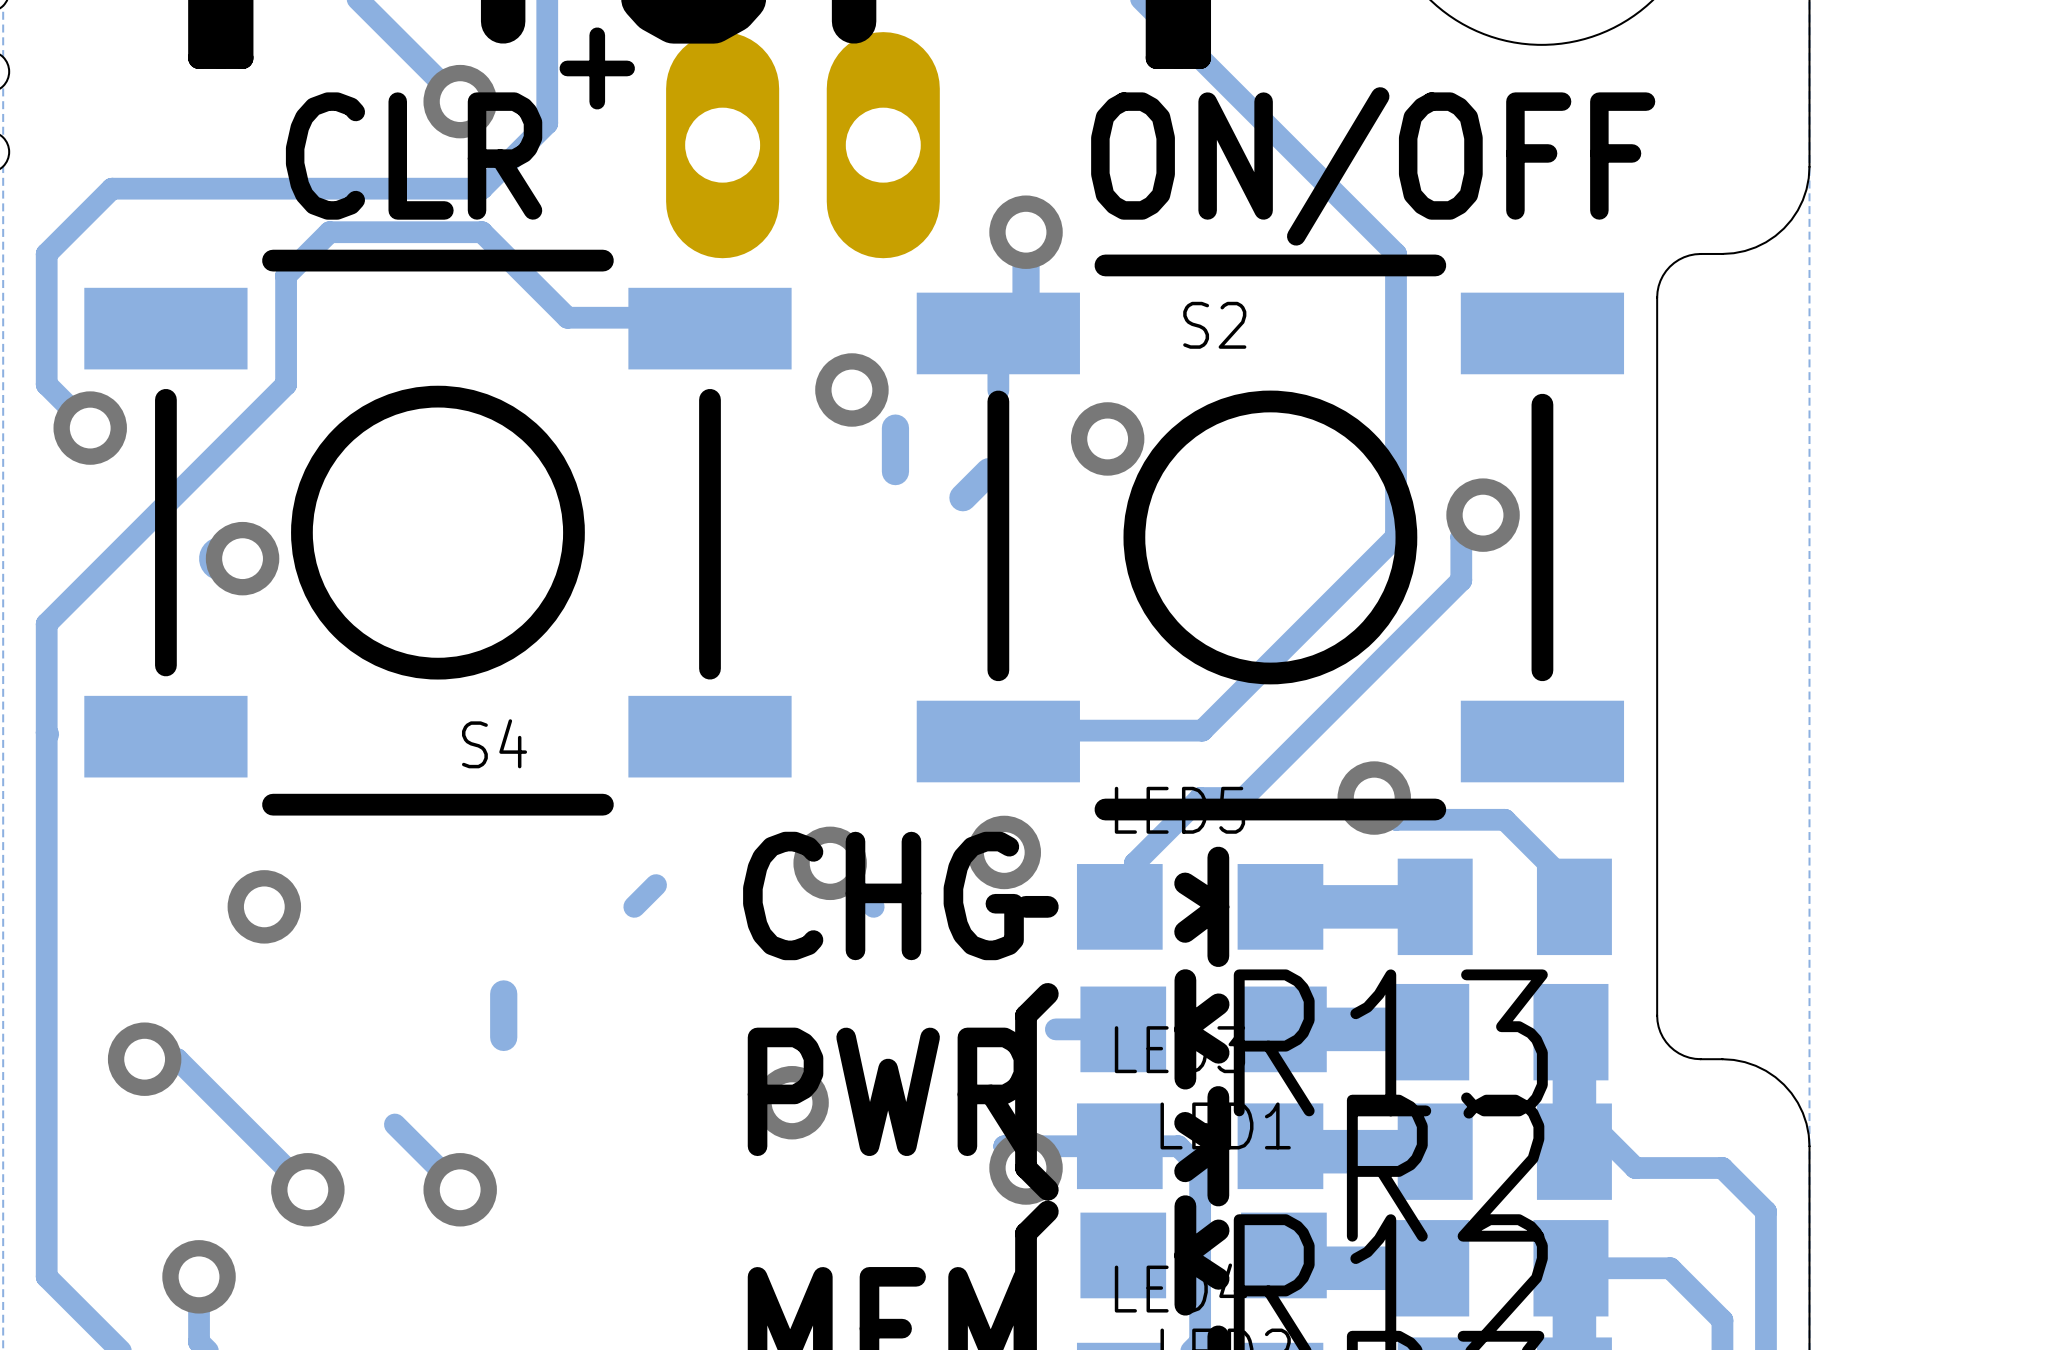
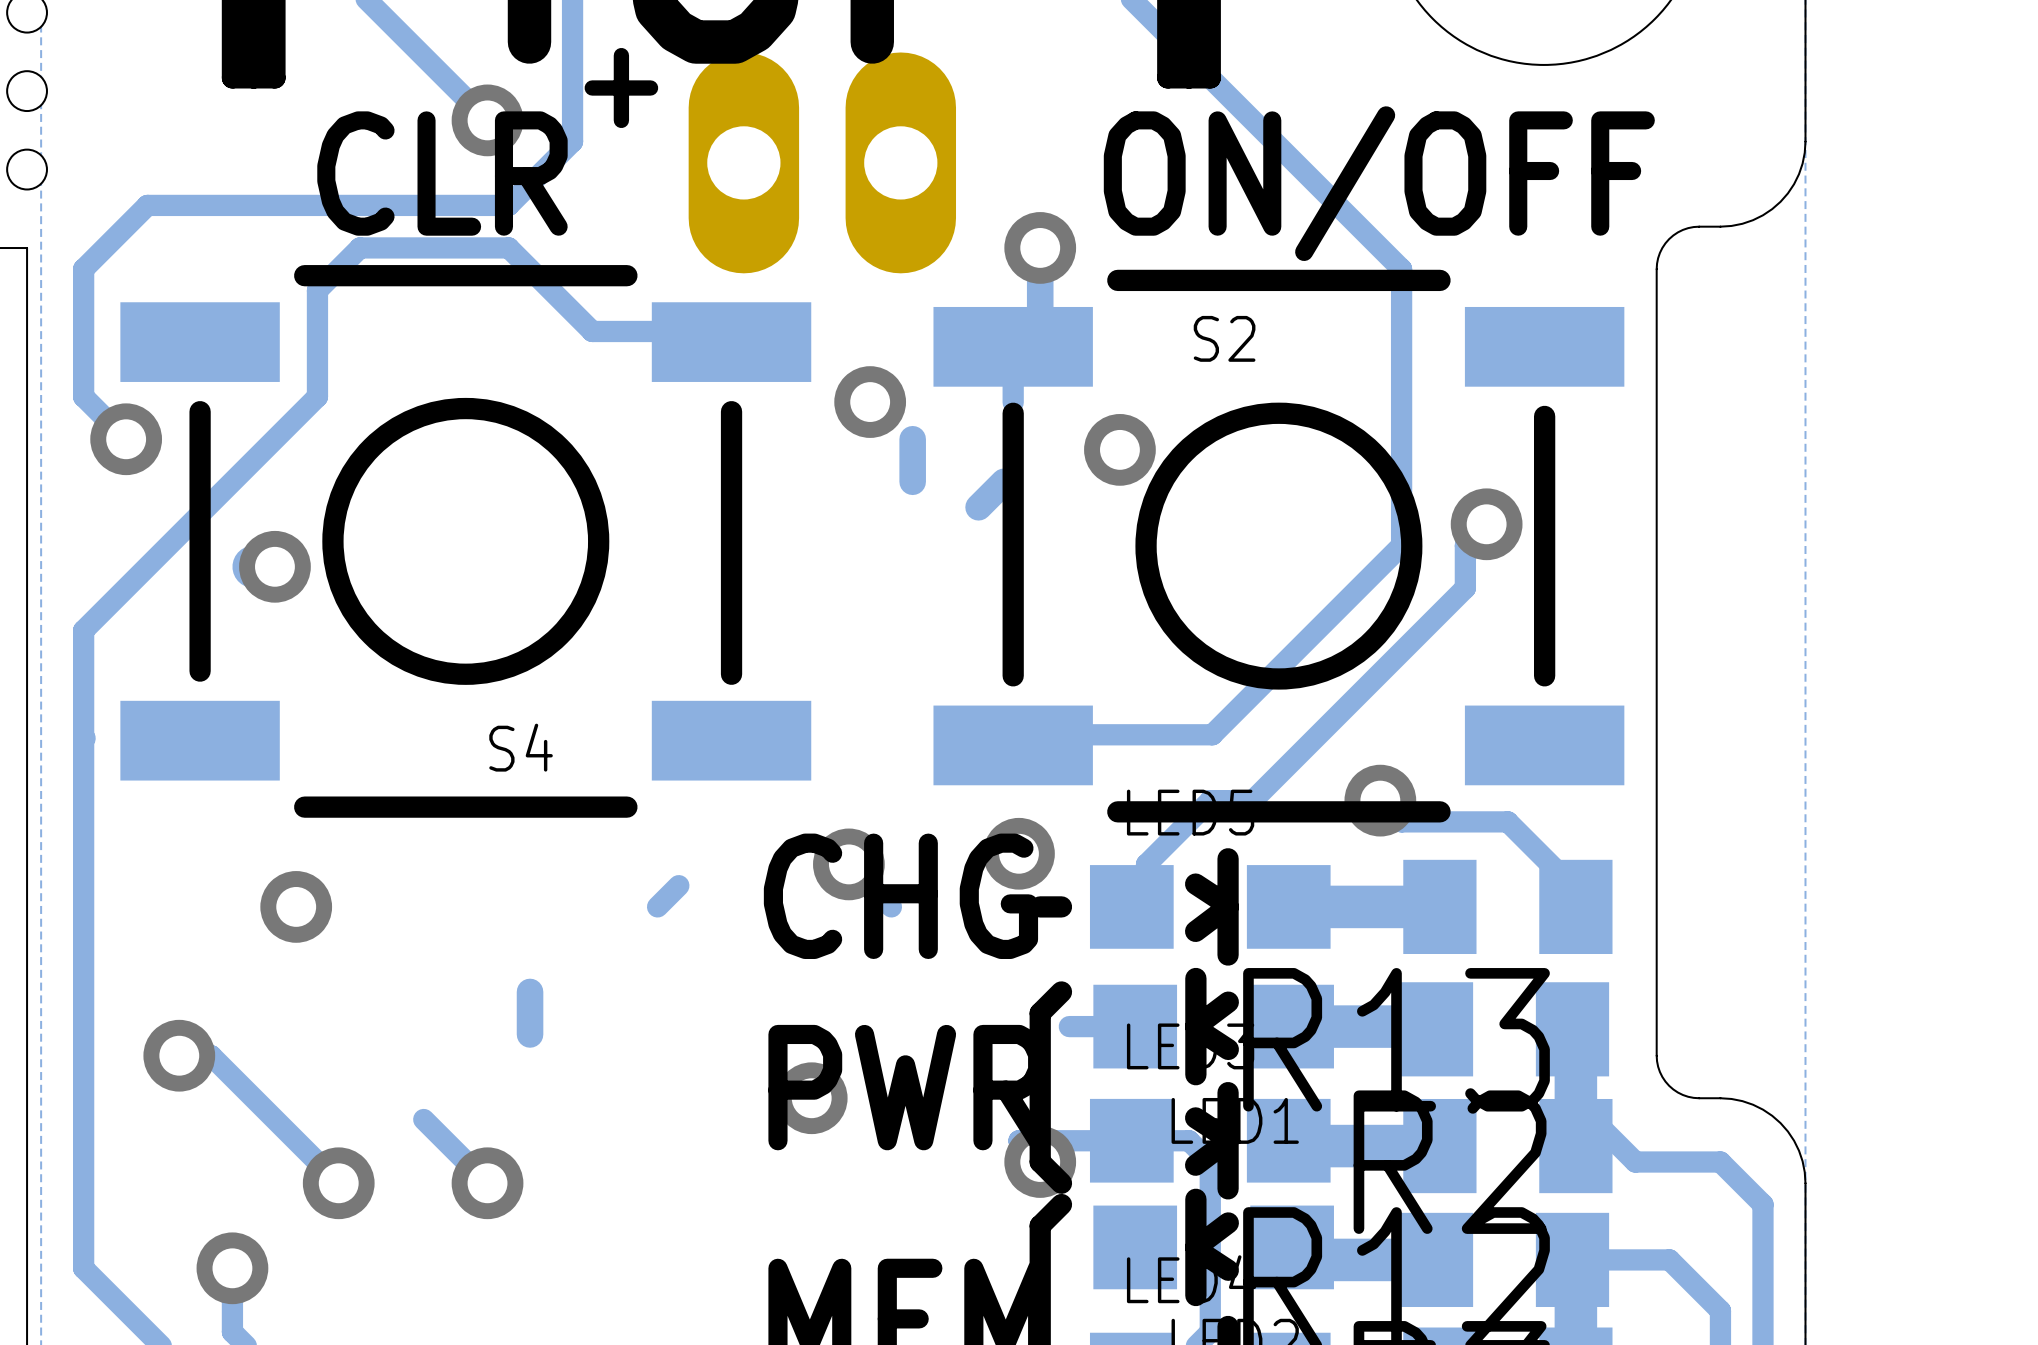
board edge: (1809, 123) (1808, 178) (1802, 200) (1791, 219) (1775, 235) (1755, 247) (1733, 253) (1695, 254) (1678, 259) (1662, 275) (1657, 297) -> (1805, 141) (1802, 163) (1794, 184) (1772, 209) (1742, 223) (1688, 228) (1677, 232) (1665, 243) (1657, 263) (1656, 311)
board edge: (1657, 1015) (1662, 1037) (1678, 1053) (1695, 1058) (1733, 1059) (1755, 1065) (1775, 1077) (1791, 1093) (1802, 1112) (1808, 1134) (1809, 1189) -> (1656, 1013) (1657, 1061) (1665, 1081) (1677, 1092) (1688, 1096) (1742, 1101) (1772, 1115) (1794, 1140) (1802, 1161) (1805, 1183)

